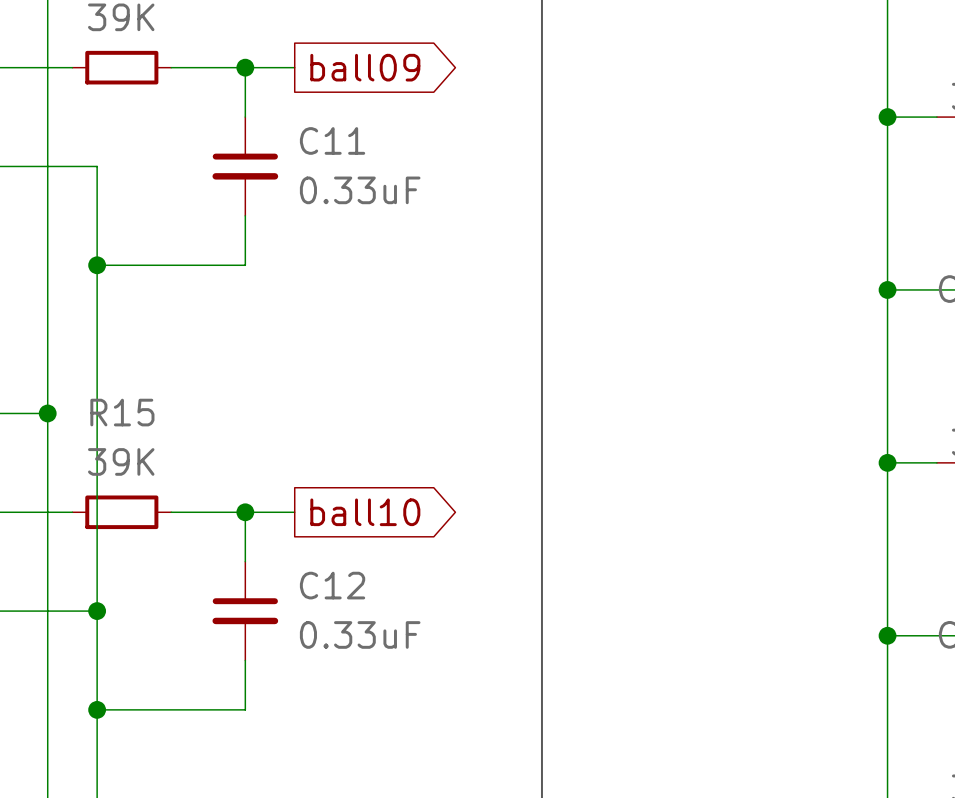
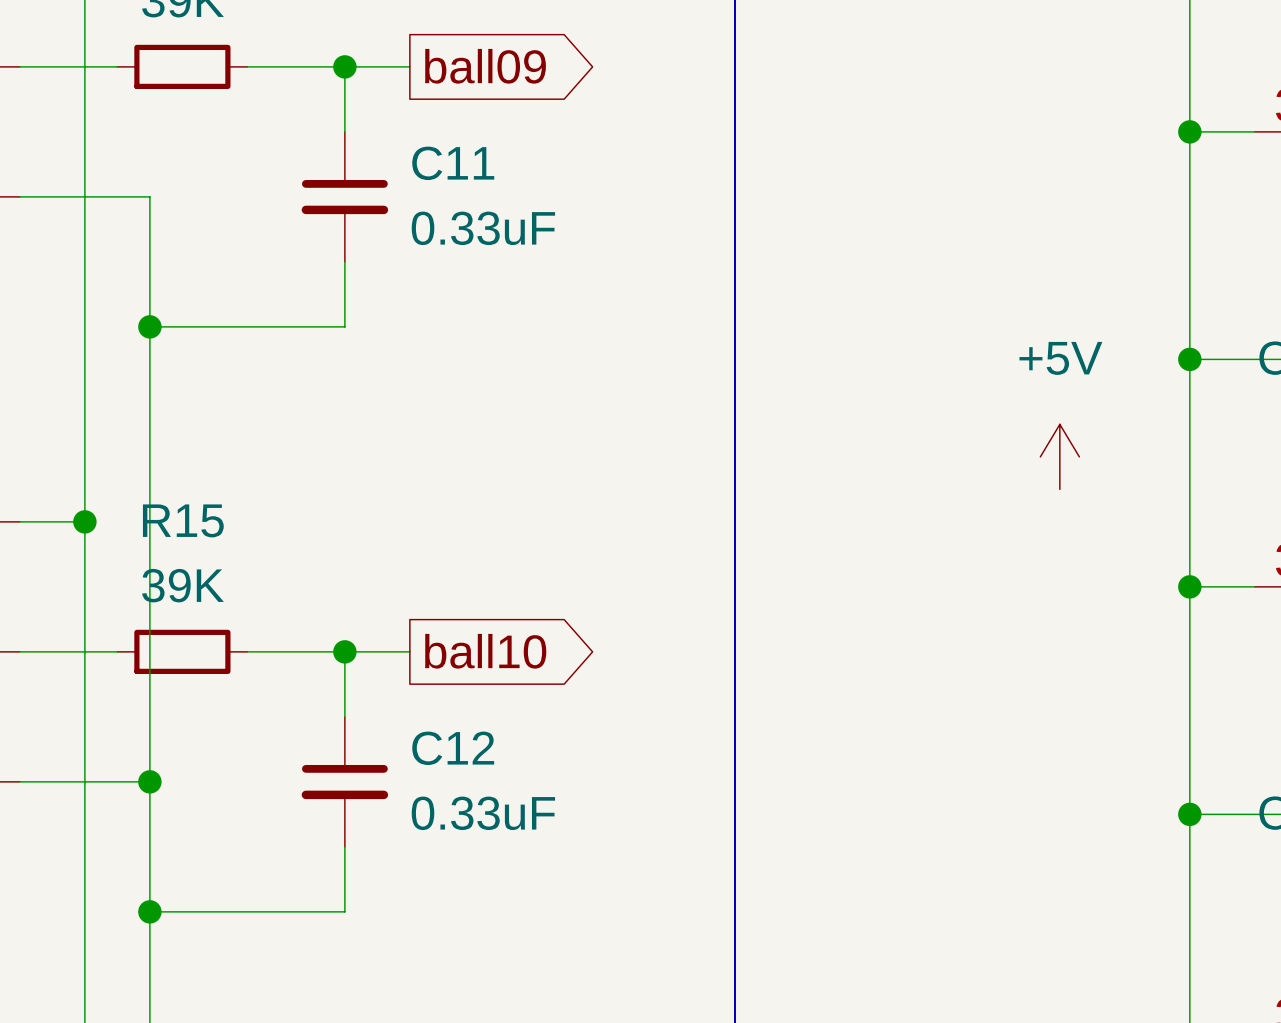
power symbol: none -> +5V (1059, 456)

